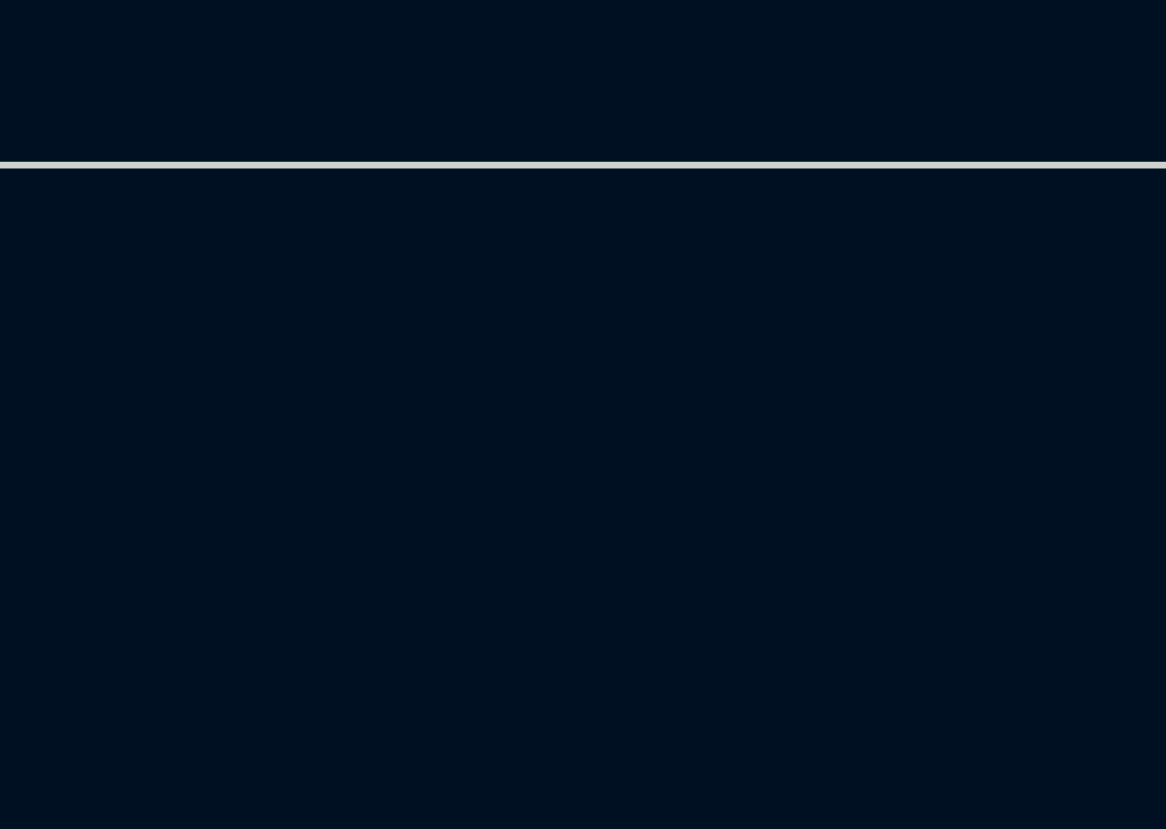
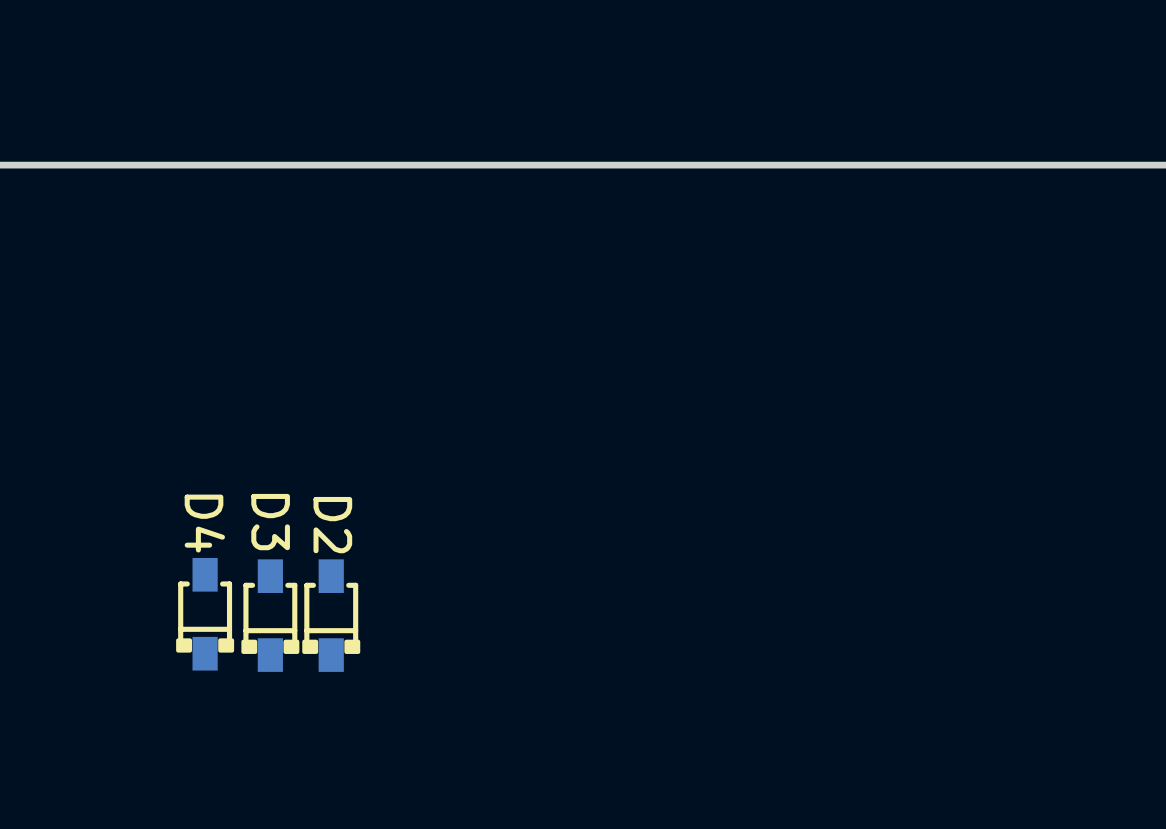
D4: none -> (205, 614)
D3: none -> (270, 615)
D2: none -> (331, 615)

